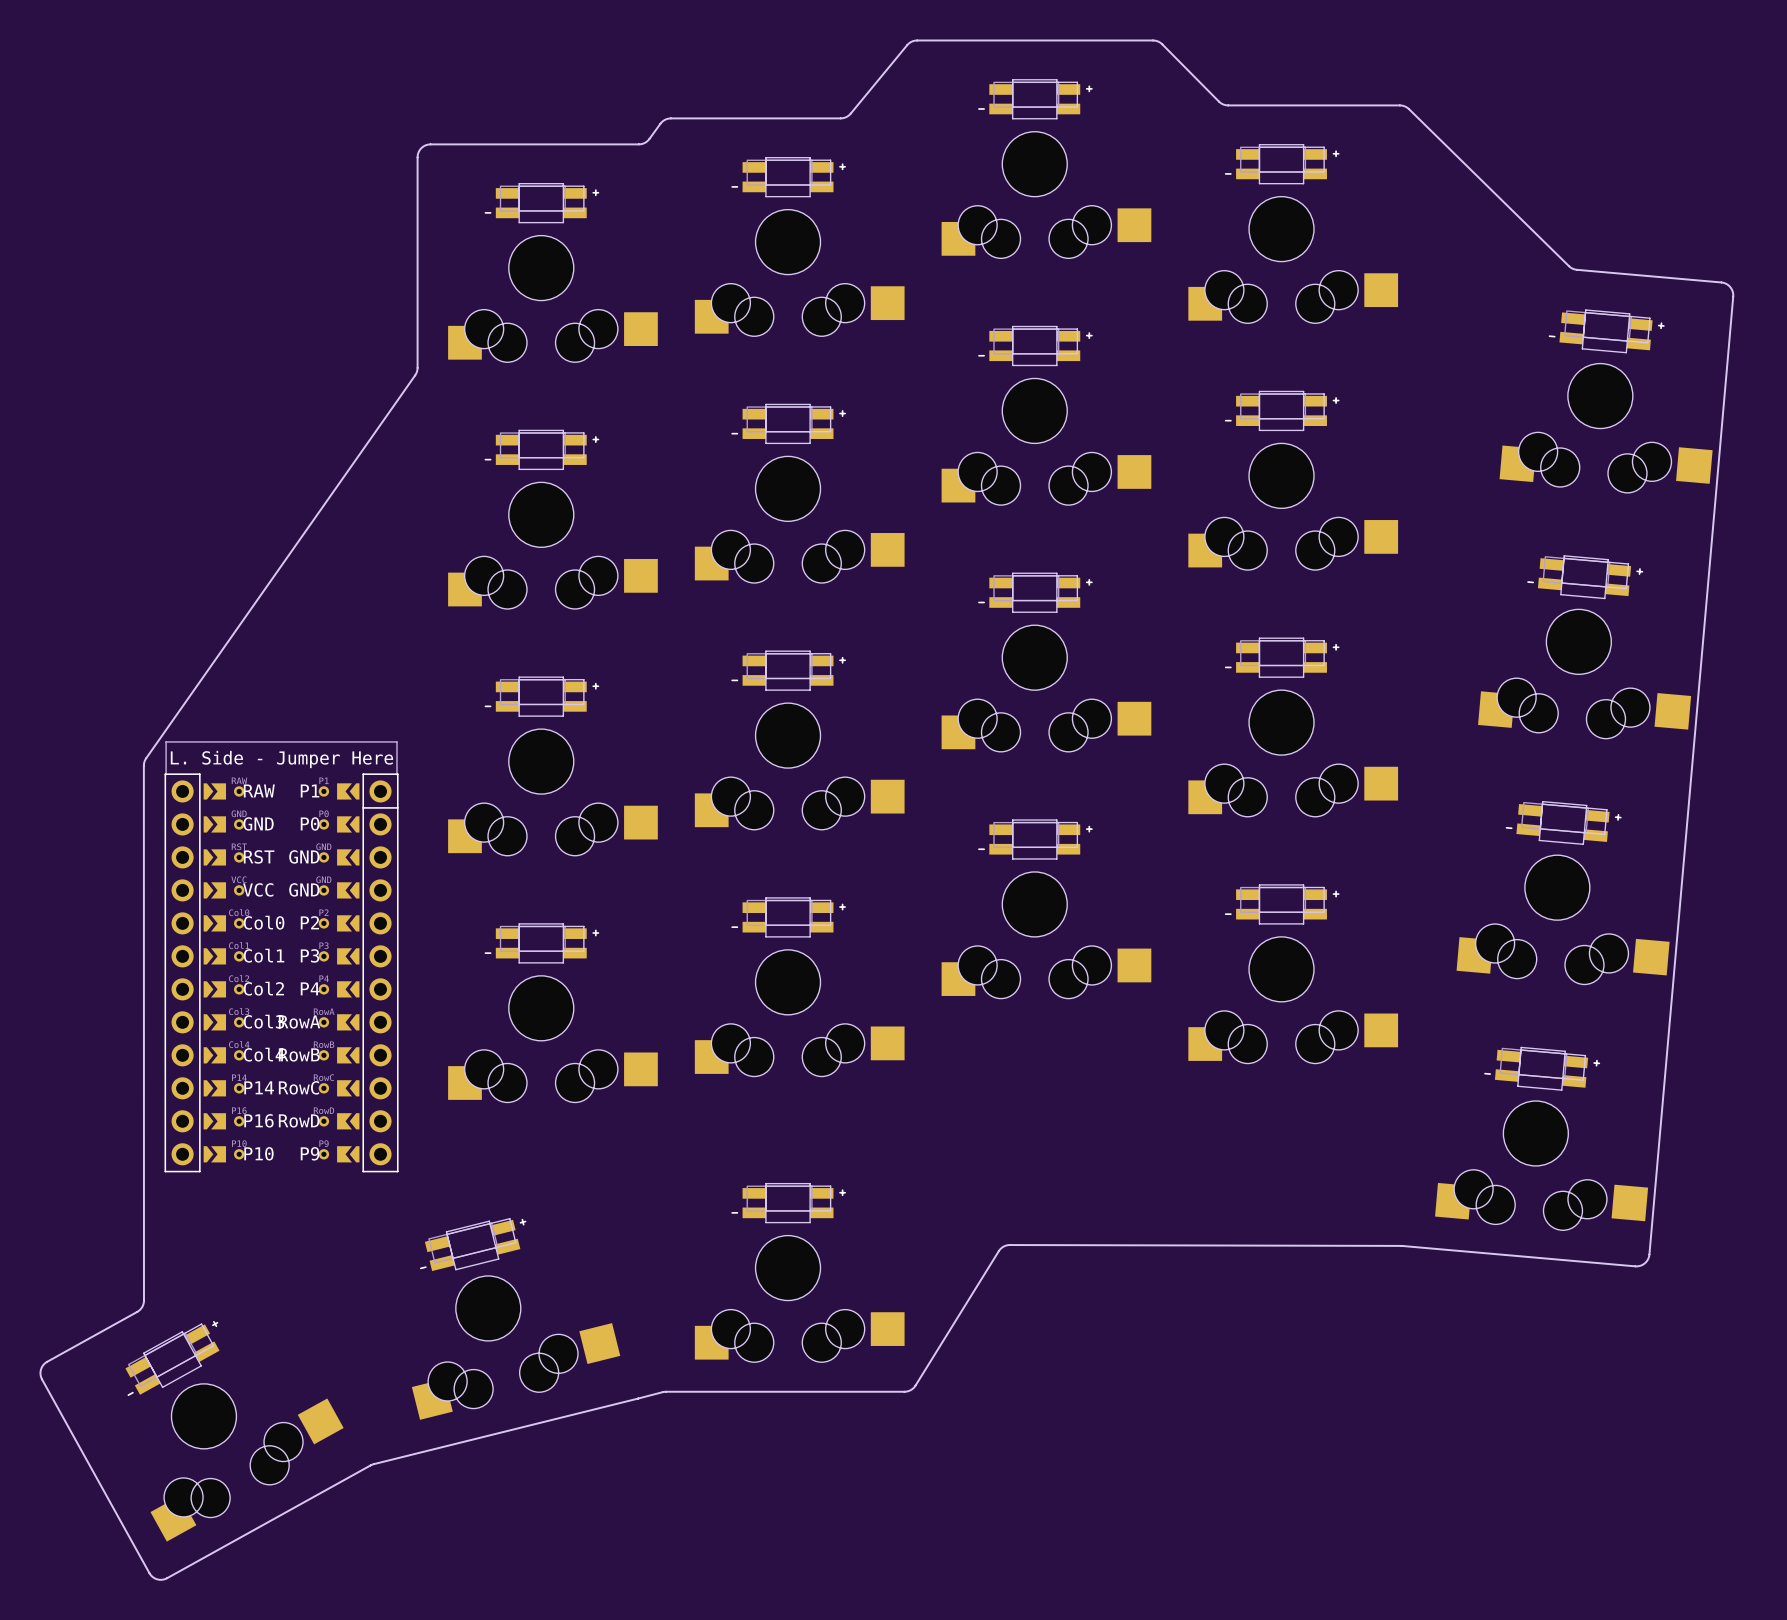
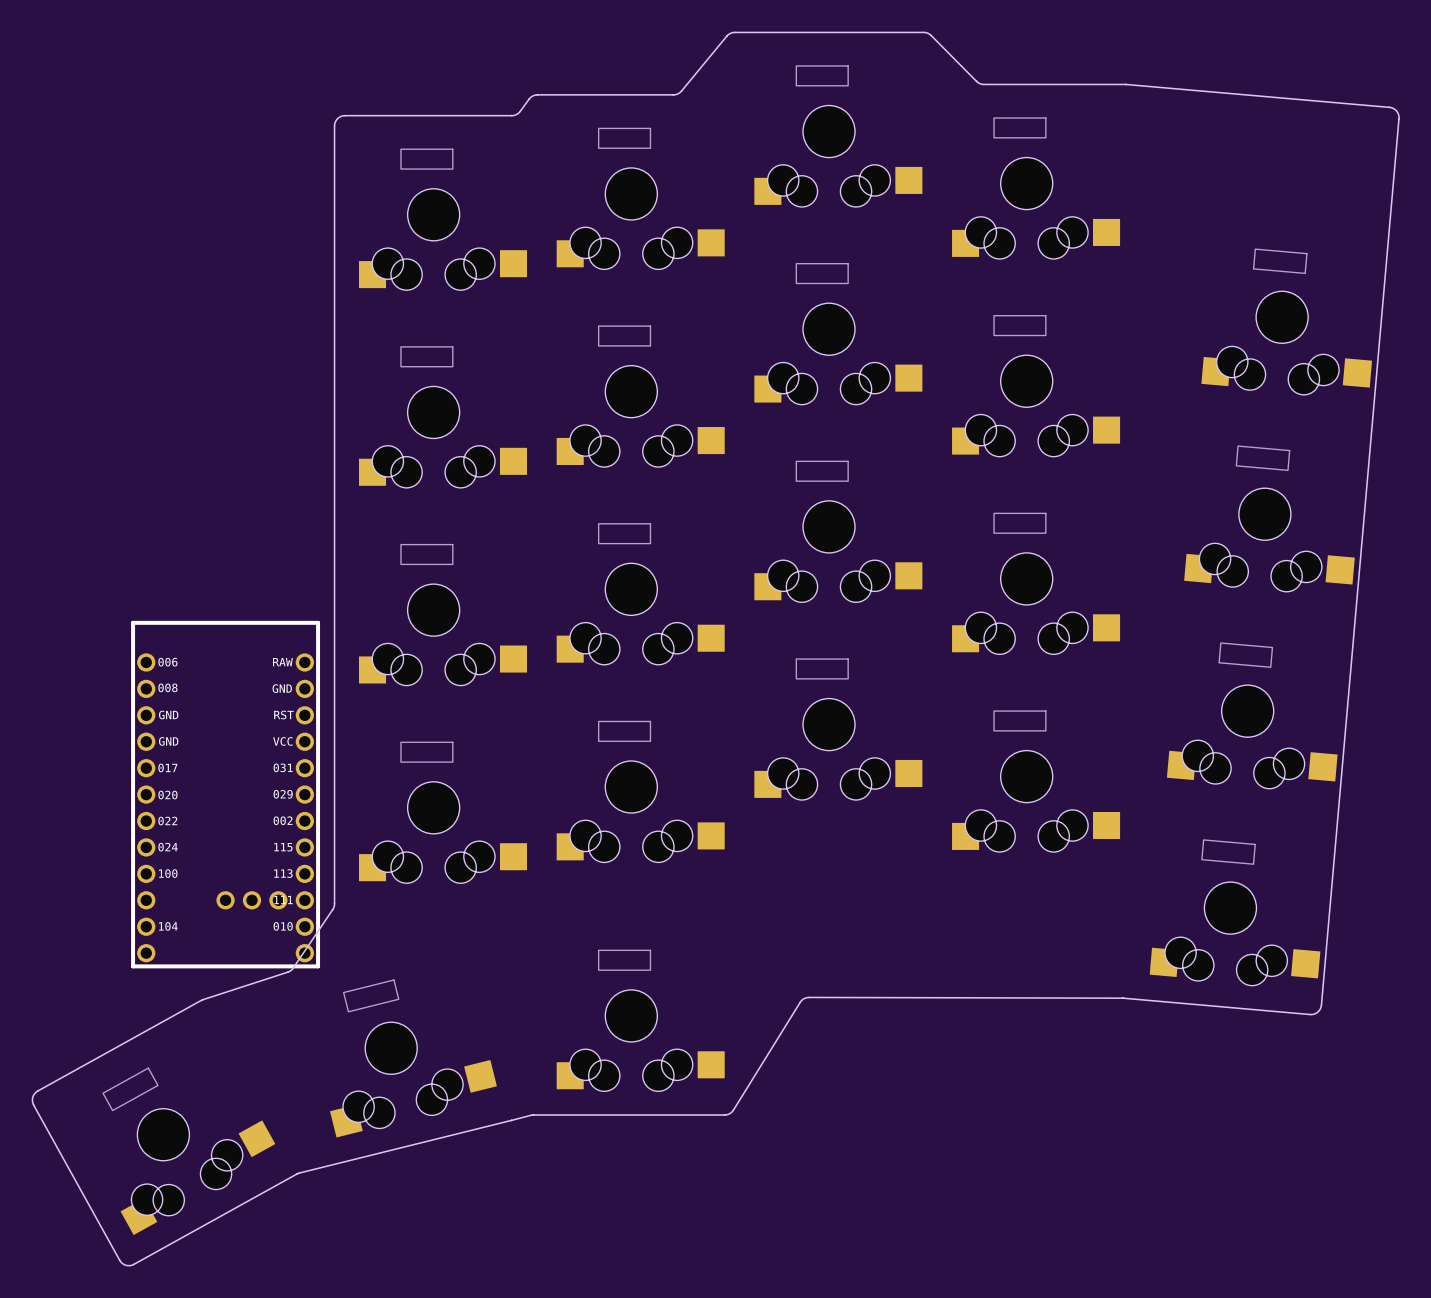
part footprint: [941, 81, 1152, 259] -> [754, 65, 923, 207]
part: (1035, 99) -> none
board edge: (1399, 105) (1409, 109) (1571, 267) (1723, 282) (1731, 288) (1733, 296) -> (1121, 84) (1393, 108) (1397, 112) (1398, 118) (1388, 237)
part footprint: [1188, 146, 1399, 324] -> [952, 117, 1121, 259]
part footprint: [694, 159, 905, 337] -> [556, 127, 725, 270]
part: (1282, 164) -> none
part: (788, 177) -> none
part footprint: [448, 185, 658, 363] -> [358, 148, 528, 291]
part: (541, 203) -> none
part footprint: [1499, 310, 1713, 493] -> [1201, 248, 1373, 395]
part footprint: [941, 328, 1152, 506] -> [754, 263, 923, 405]
part: (1606, 331) -> none
part: (1035, 346) -> none
board edge: (417, 367) (415, 375) (144, 761) (143, 1300) (142, 1307) (137, 1311) -> (334, 294) (334, 906) (289, 971) (202, 1000) (109, 1051)
part footprint: [1188, 393, 1399, 571] -> [952, 315, 1121, 457]
part footprint: [694, 406, 905, 584] -> [556, 325, 725, 468]
part: (1282, 410) -> none
part: (788, 423) -> none
part footprint: [448, 432, 658, 609] -> [358, 346, 528, 488]
part: (541, 449) -> none
part footprint: [1478, 556, 1692, 739] -> [1184, 445, 1355, 592]
part footprint: [941, 575, 1152, 752] -> [754, 460, 923, 603]
part: (1585, 577) -> none
part: (1035, 592) -> none
part footprint: [1188, 640, 1399, 817] -> [952, 512, 1121, 655]
part footprint: [694, 653, 905, 830] -> [556, 523, 725, 665]
part: (1282, 657) -> none
part: (788, 670) -> none
part footprint: [448, 679, 658, 856] -> [358, 544, 528, 686]
part: (541, 696) -> none
part footprint: [1456, 801, 1670, 985] -> [1166, 642, 1338, 789]
part footprint: [941, 821, 1152, 999] -> [754, 658, 923, 801]
part: (1563, 822) -> none
part: (1035, 839) -> none
part footprint: [1188, 886, 1399, 1064] -> [952, 710, 1121, 853]
part footprint: [694, 899, 905, 1077] -> [556, 720, 725, 863]
part: (1282, 904) -> none
part: (788, 917) -> none
part footprint: [448, 925, 658, 1103] -> [358, 741, 528, 884]
part: (541, 943) -> none
part: (281, 956) -> none
part: none -> (225, 794)
part footprint: [1435, 1047, 1649, 1231] -> [1149, 839, 1321, 986]
part: (1542, 1068) -> none
part footprint: [694, 1185, 905, 1363] -> [556, 949, 725, 1092]
part: (788, 1203) -> none
part footprint: [411, 1218, 621, 1420] -> [329, 979, 497, 1138]
part: (473, 1244) -> none
part footprint: [127, 1323, 344, 1542] -> [102, 1067, 276, 1236]
part: (172, 1358) -> none

